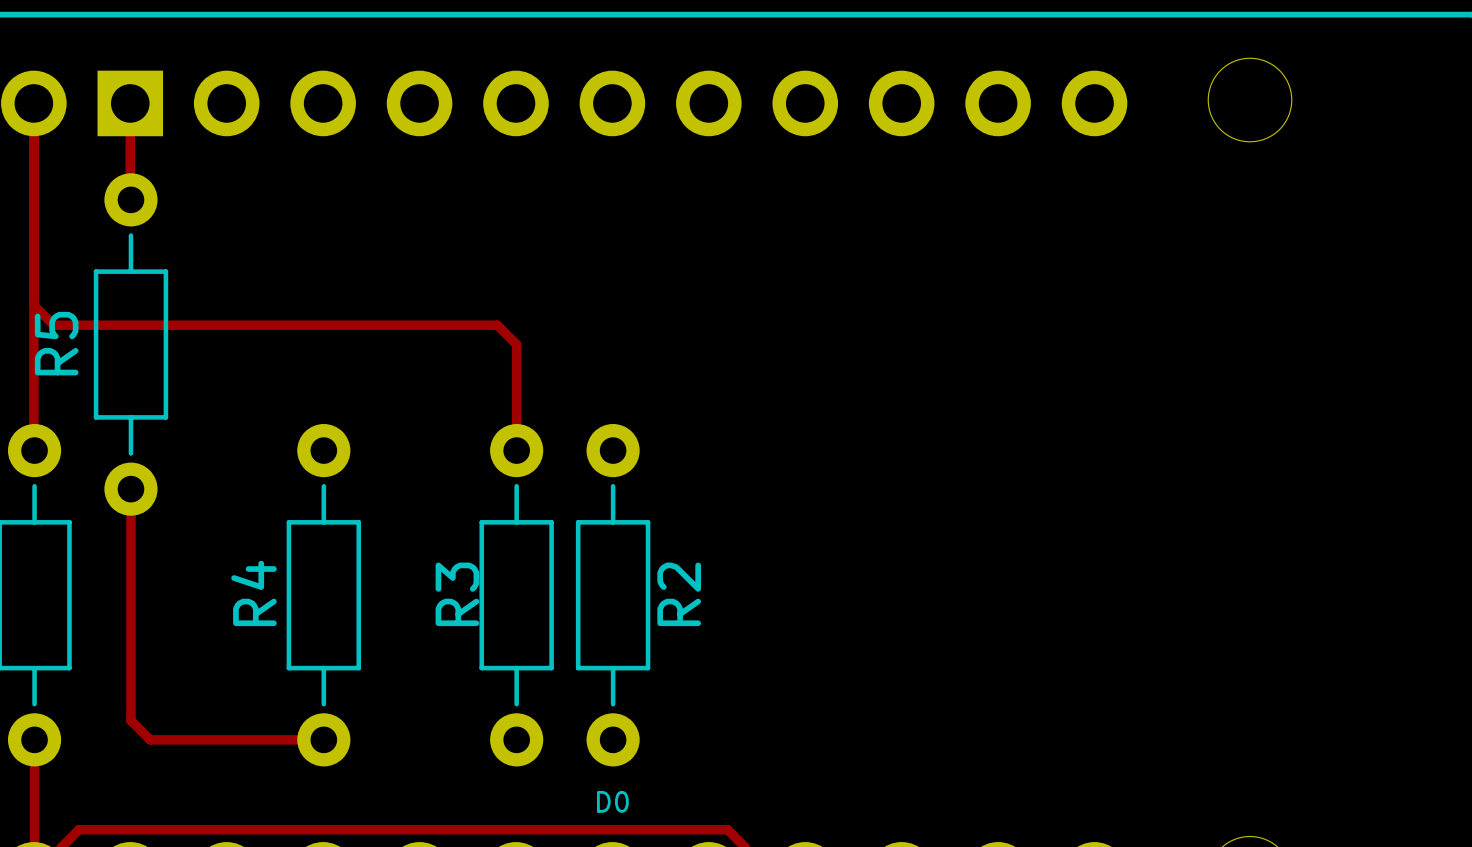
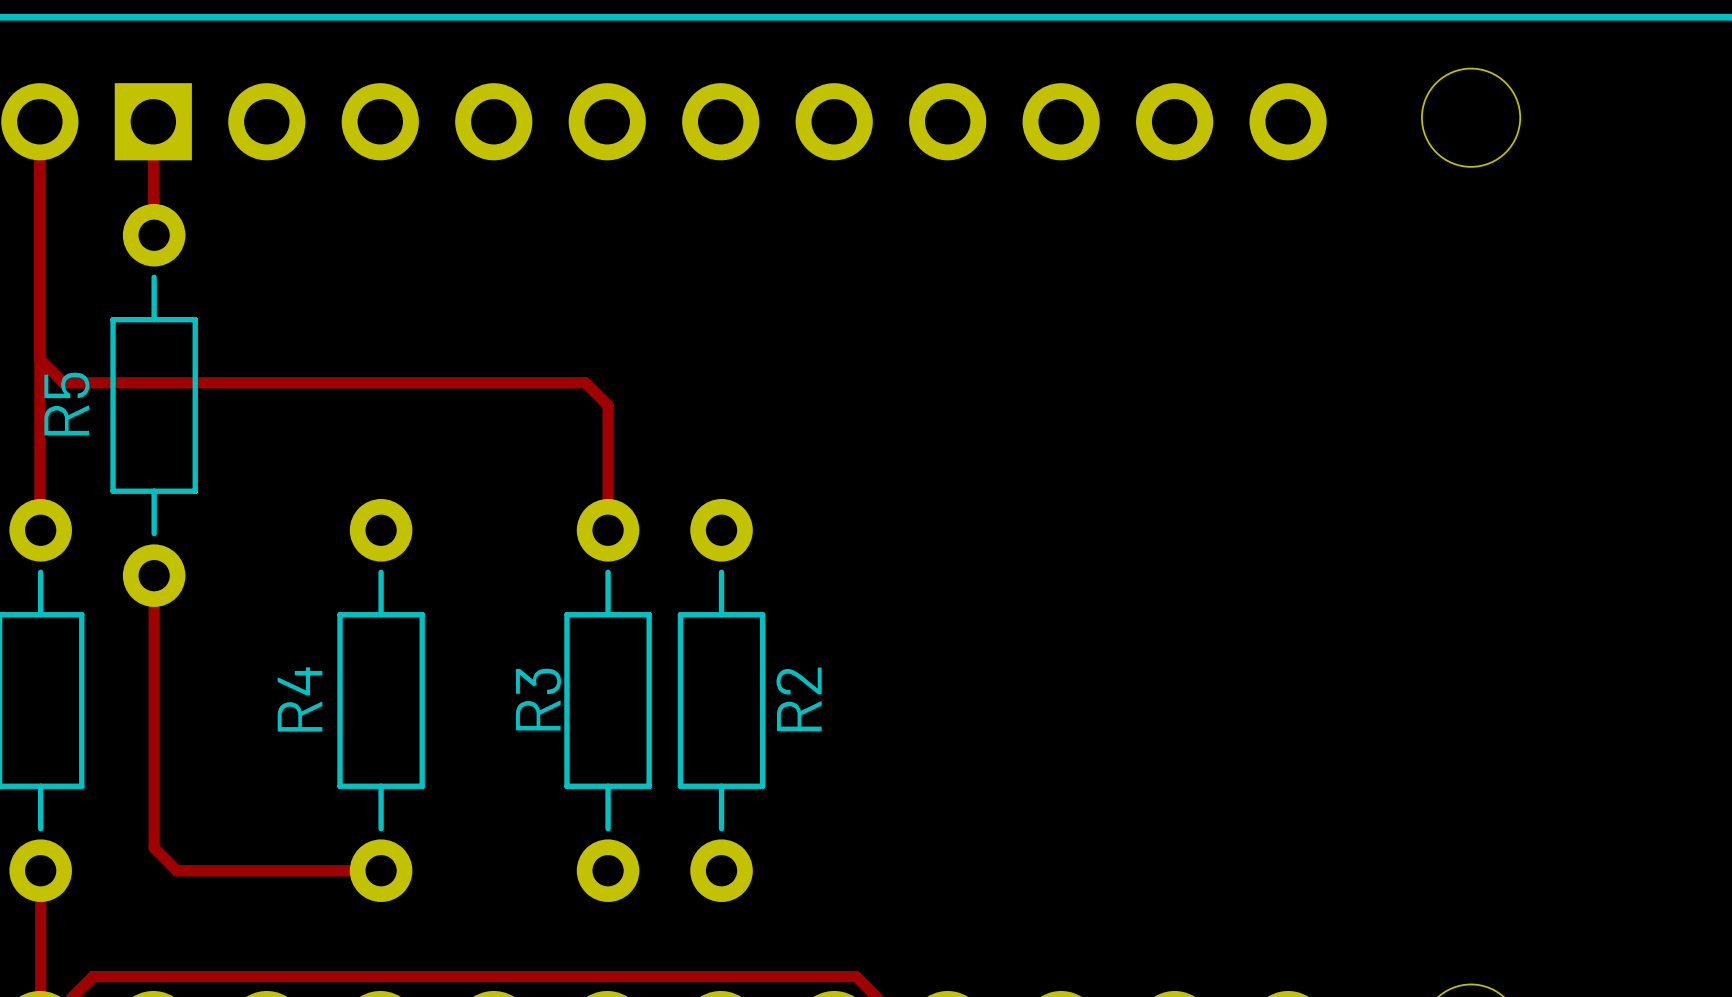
part text: D0 (612, 801) -> none

